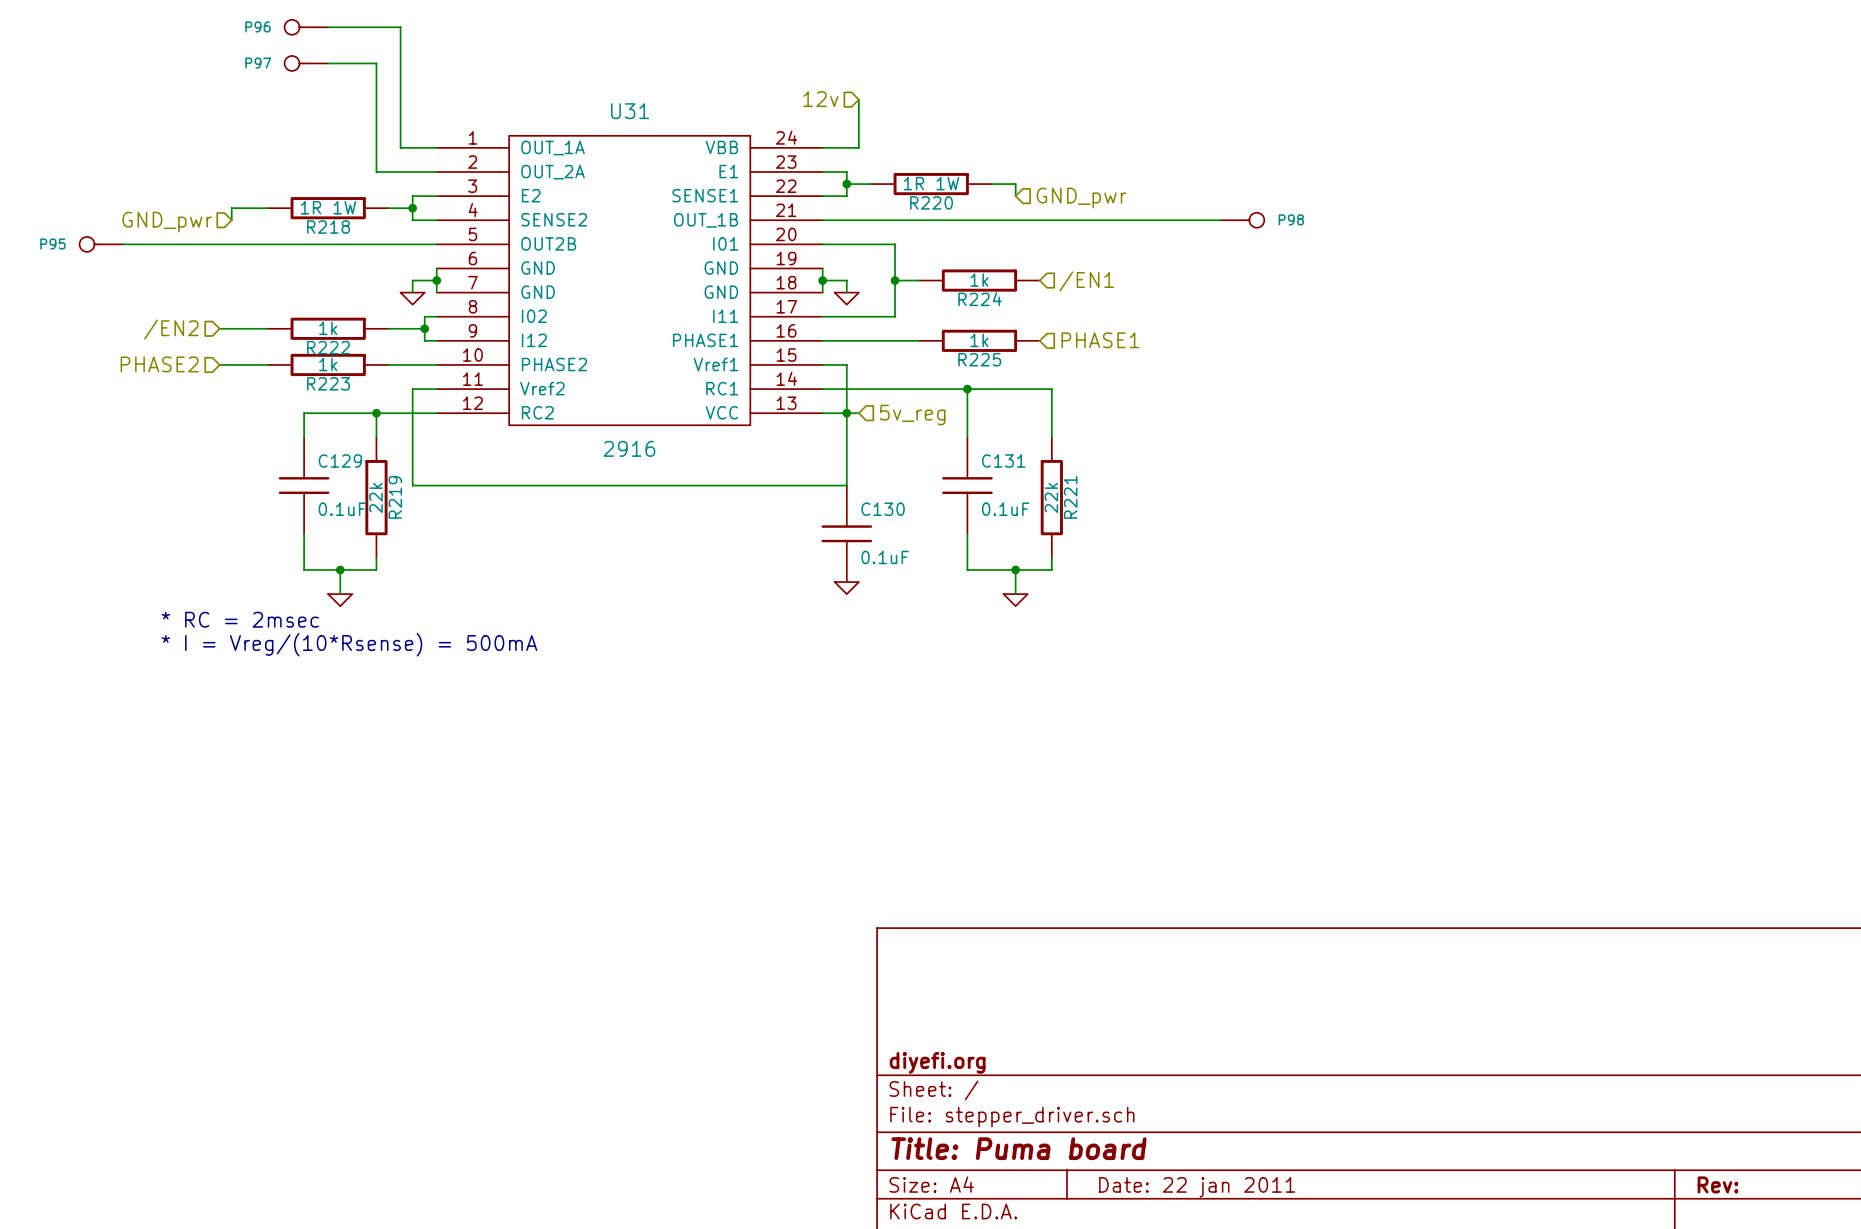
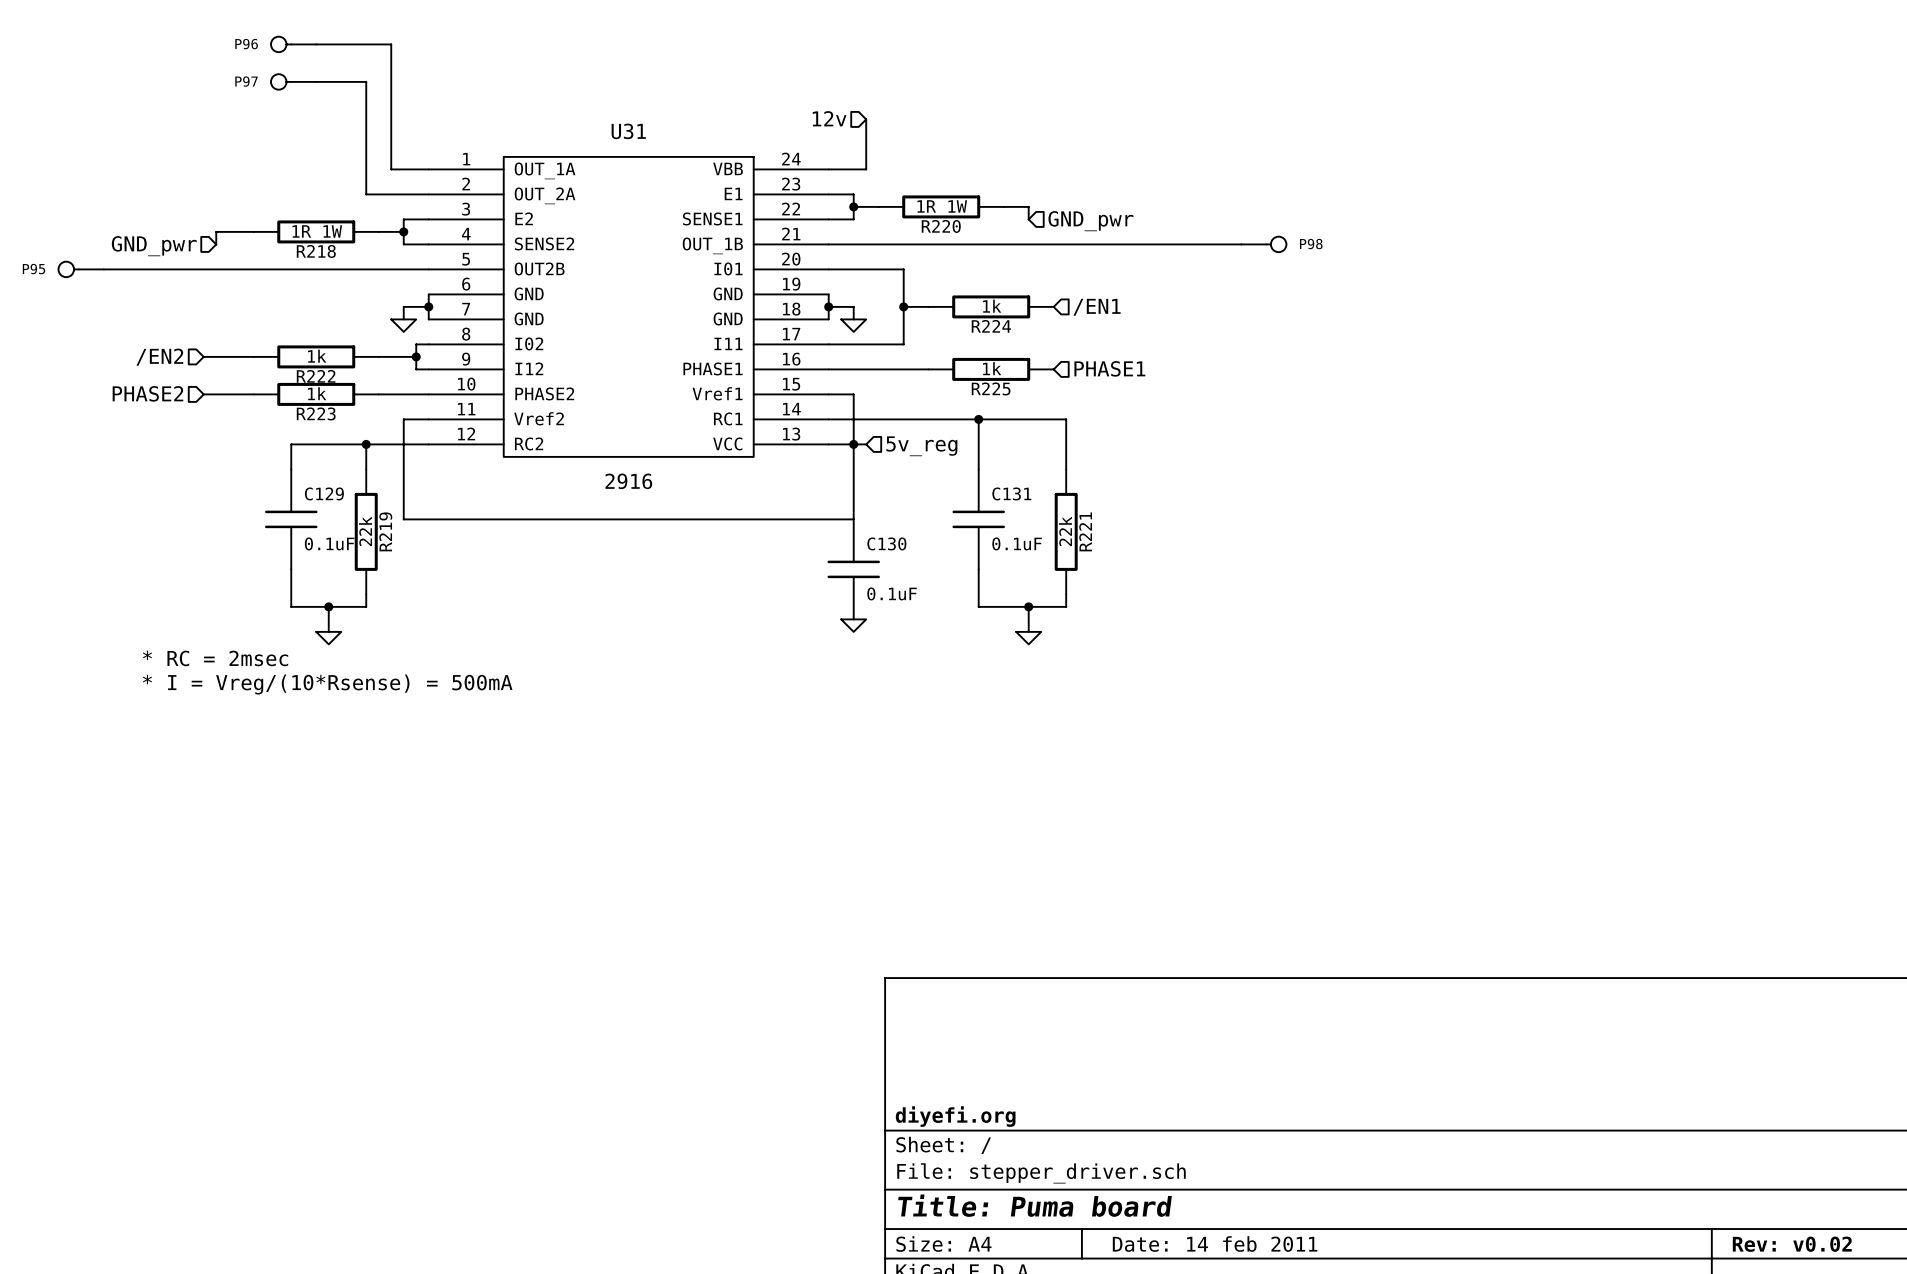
title block: Rev: (1718, 1184) -> Rev: v0.02 (1792, 1244)
title block: Date: 22 jan 2011 (1197, 1187) -> Date: 14 feb 2011 (1215, 1244)

